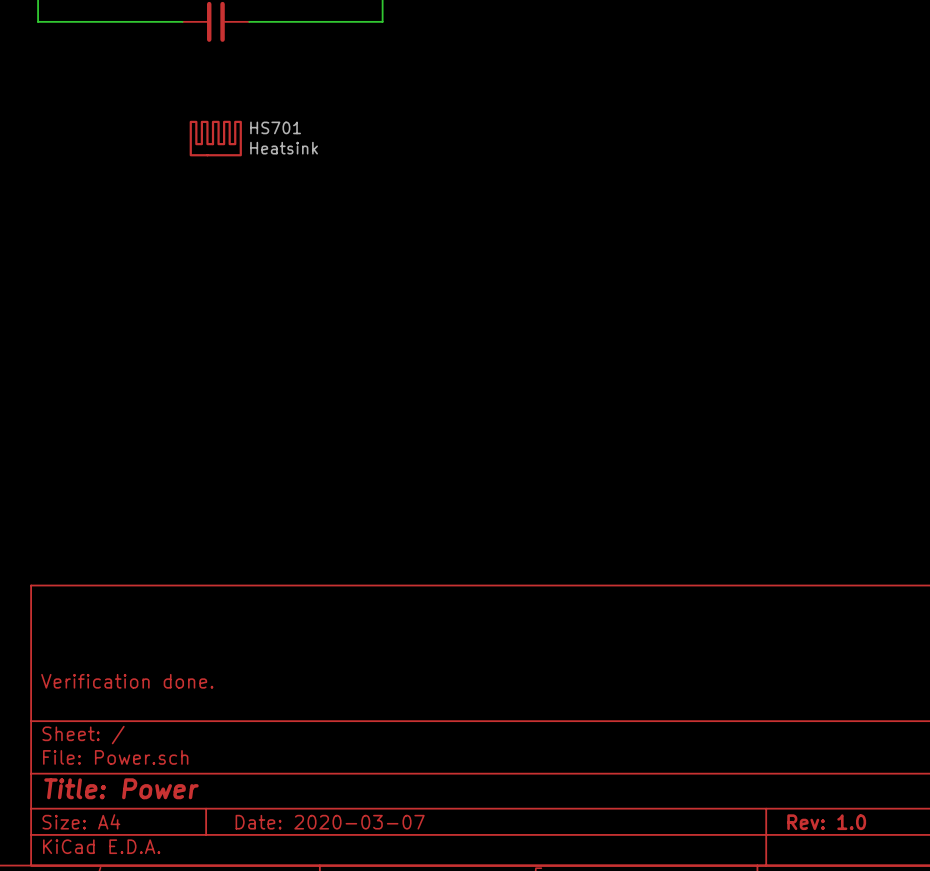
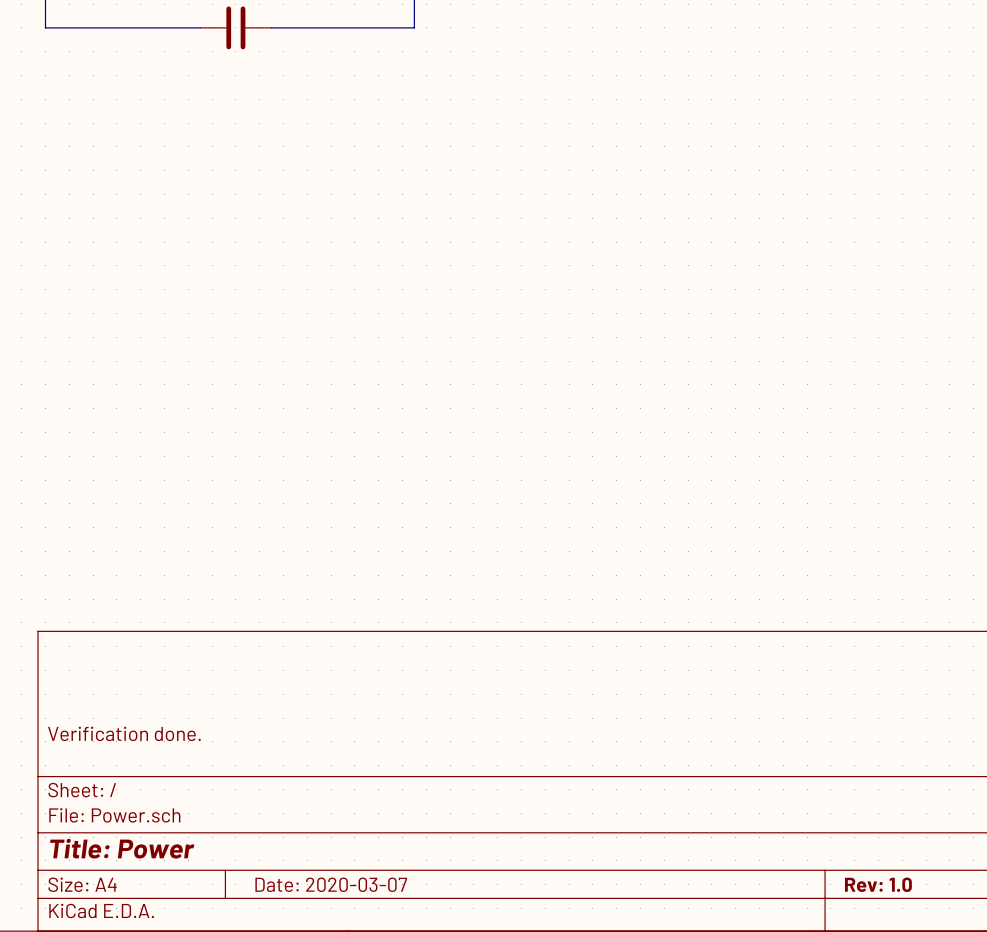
HS701: Heatsink (215, 138) -> none

